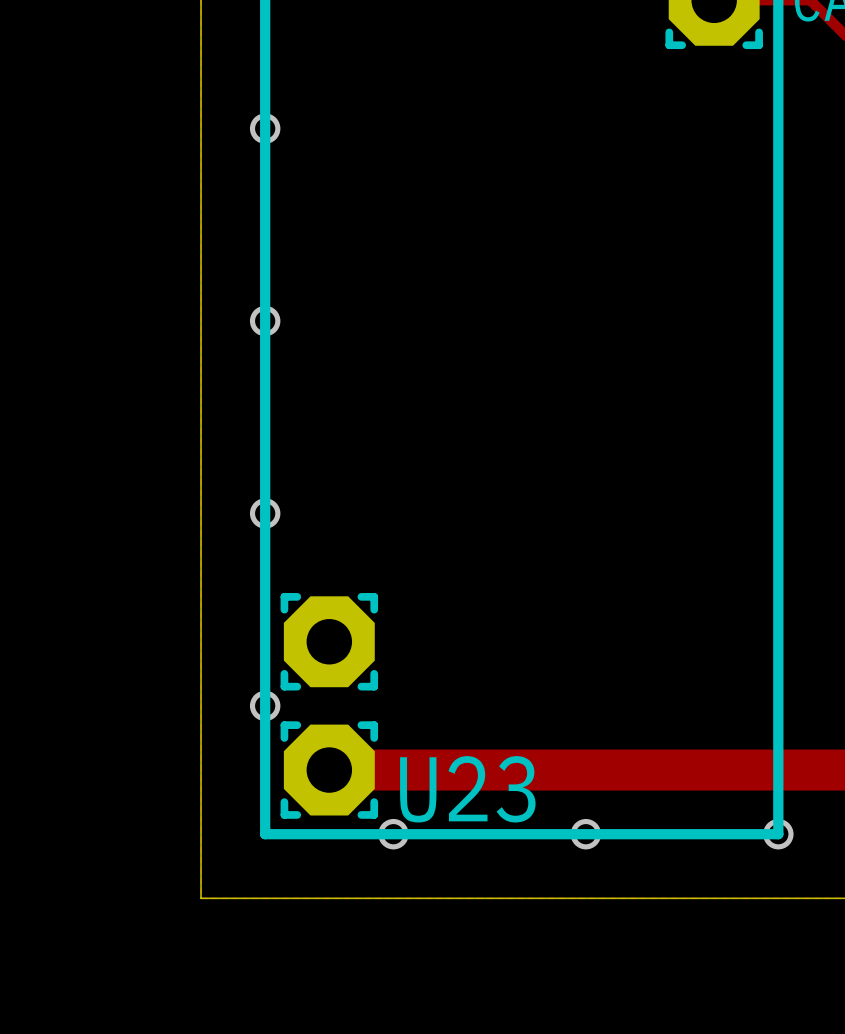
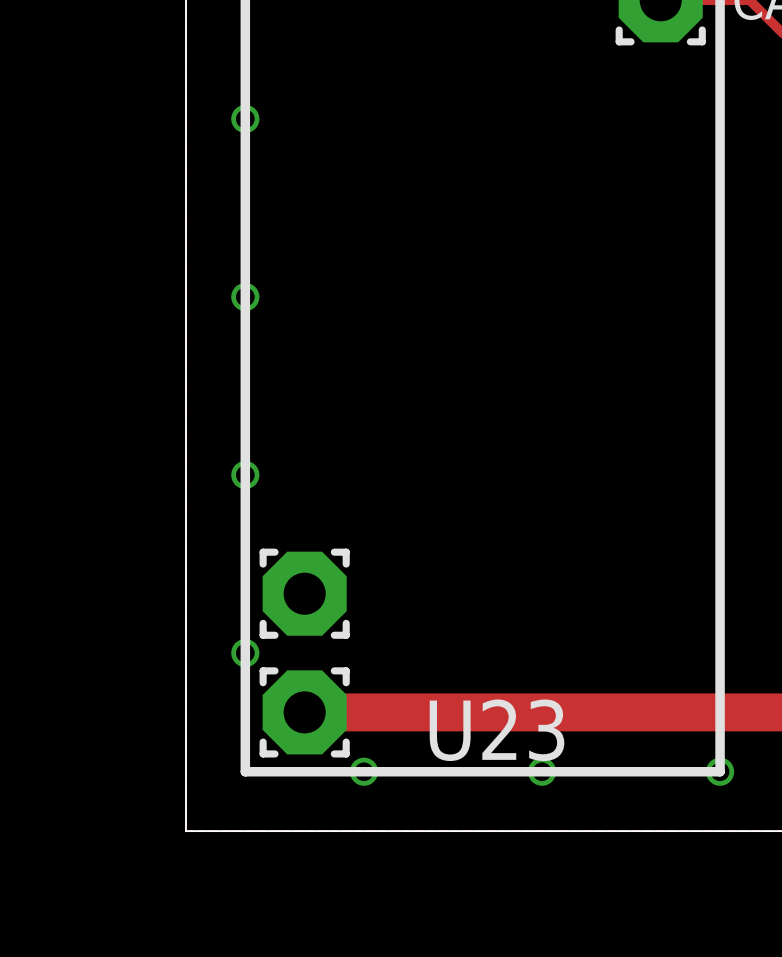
text position: U23 (467, 789) -> U23 (497, 730)

